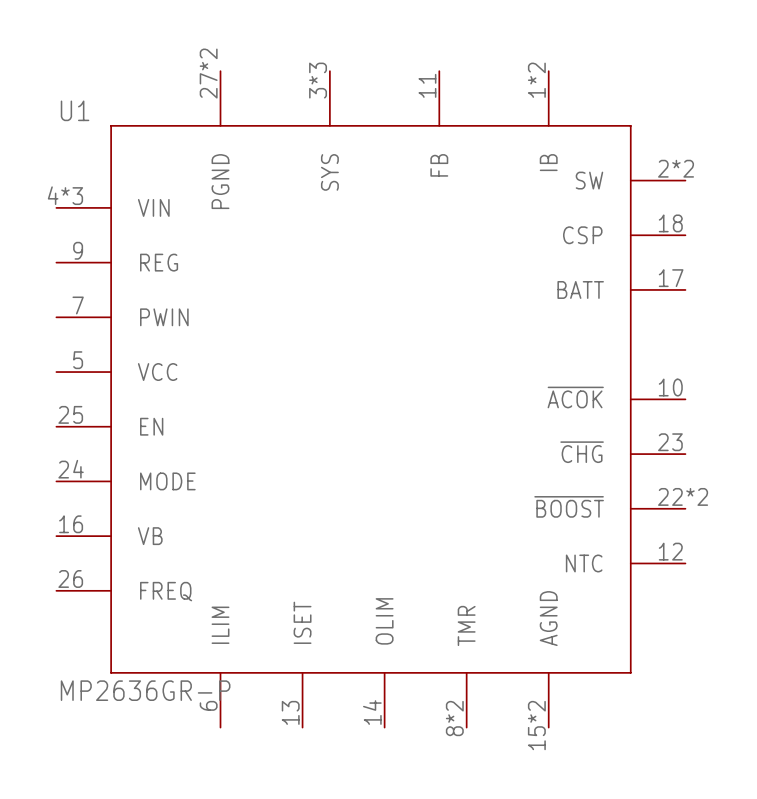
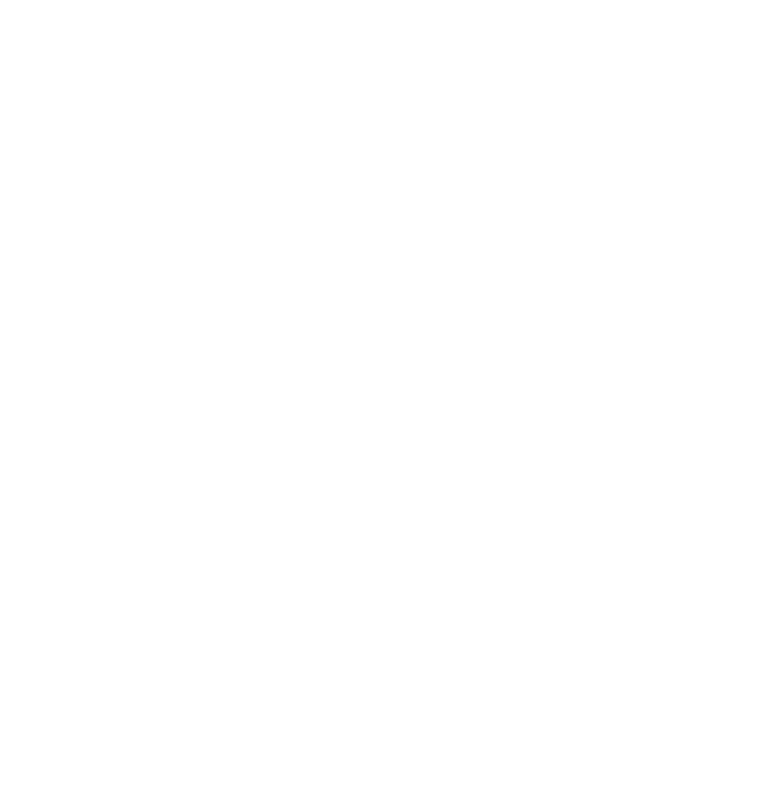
U1: MP2636GR-P (370, 399) -> none

